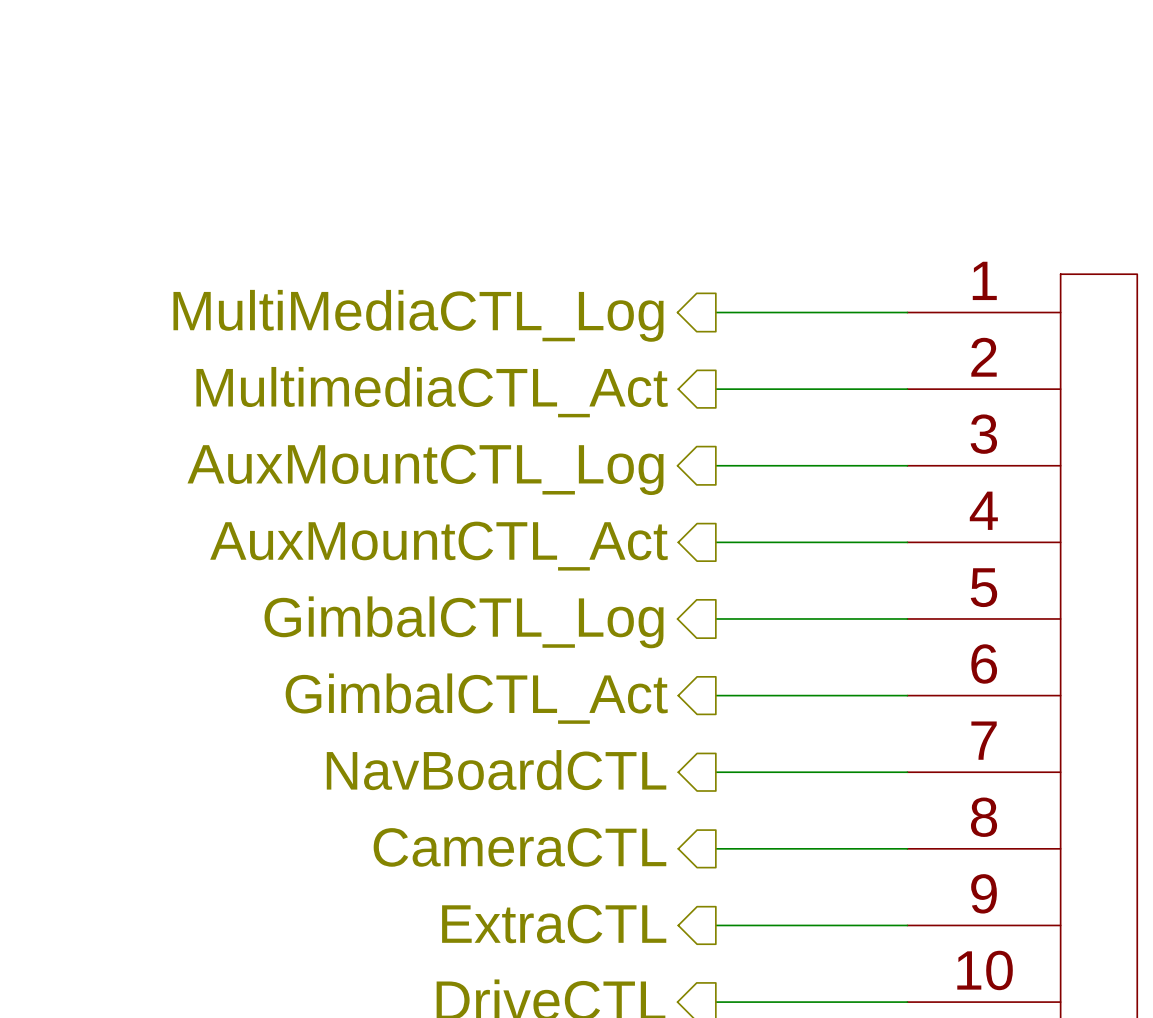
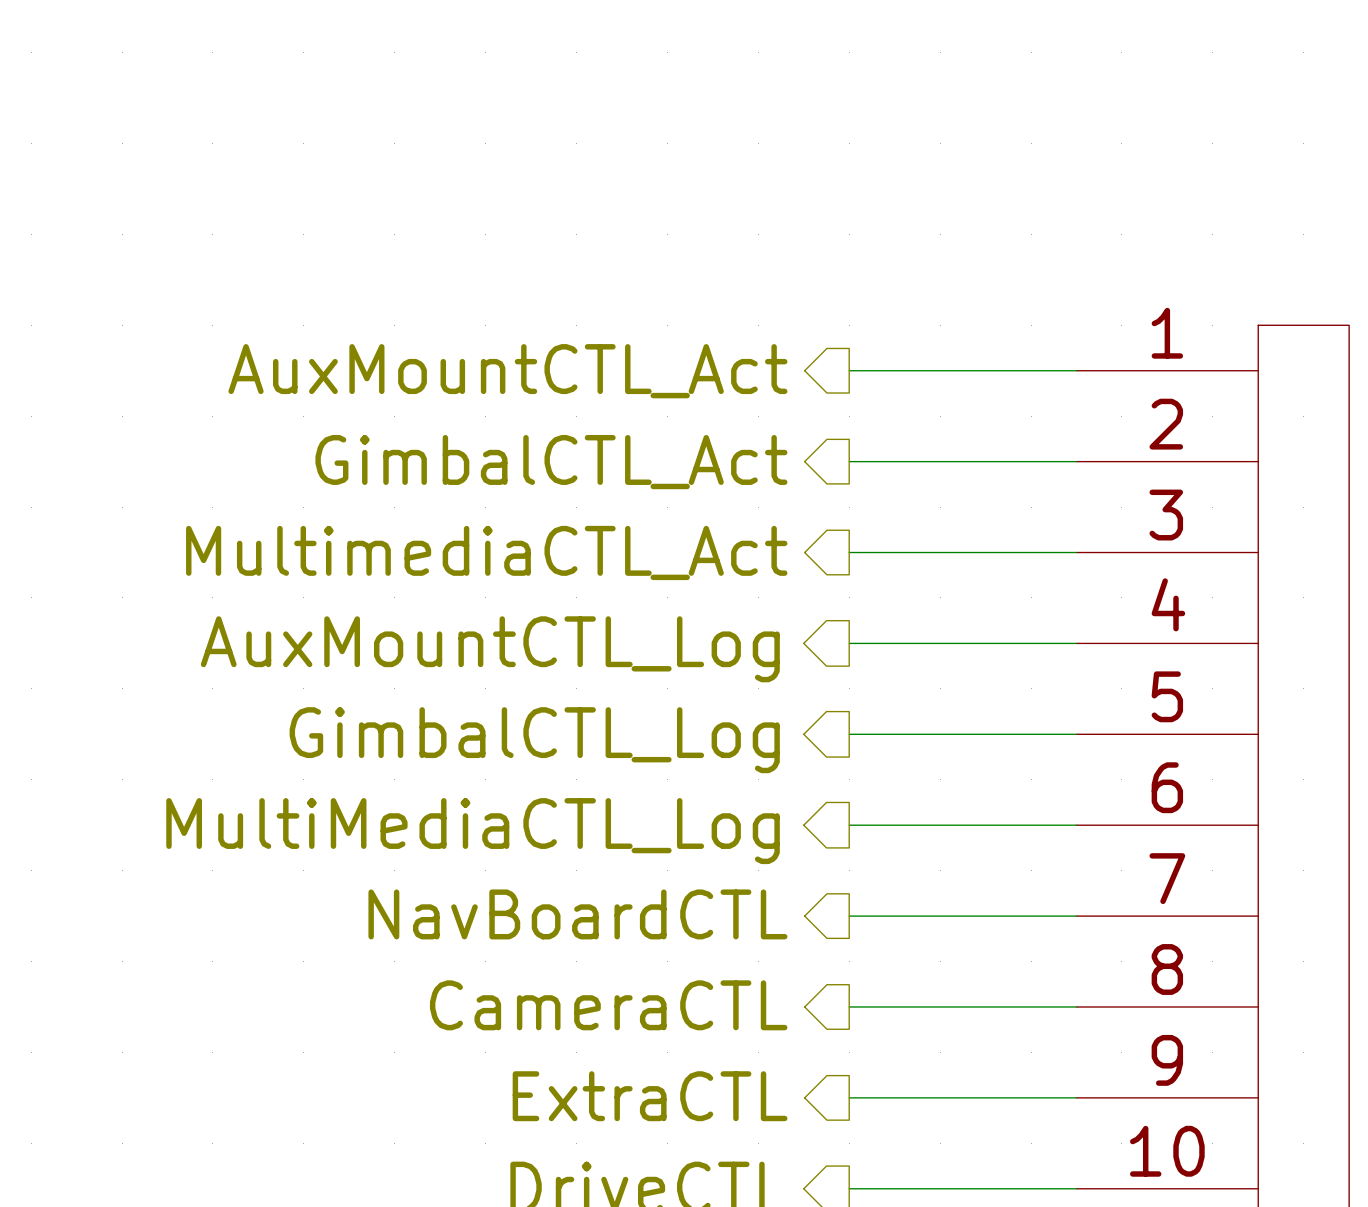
hierarchical label: MultiMediaCTL_Log (418, 315) -> AuxMountCTL_Act (507, 371)
hierarchical label: MultimediaCTL_Act (432, 392) -> GimbalCTL_Act (551, 462)
hierarchical label: AuxMountCTL_Log (425, 469) -> MultimediaCTL_Act (486, 552)
hierarchical label: AuxMountCTL_Act (438, 546) -> AuxMountCTL_Log (490, 649)
hierarchical label: GimbalCTL_Act (476, 698) -> MultiMediaCTL_Log (473, 831)

